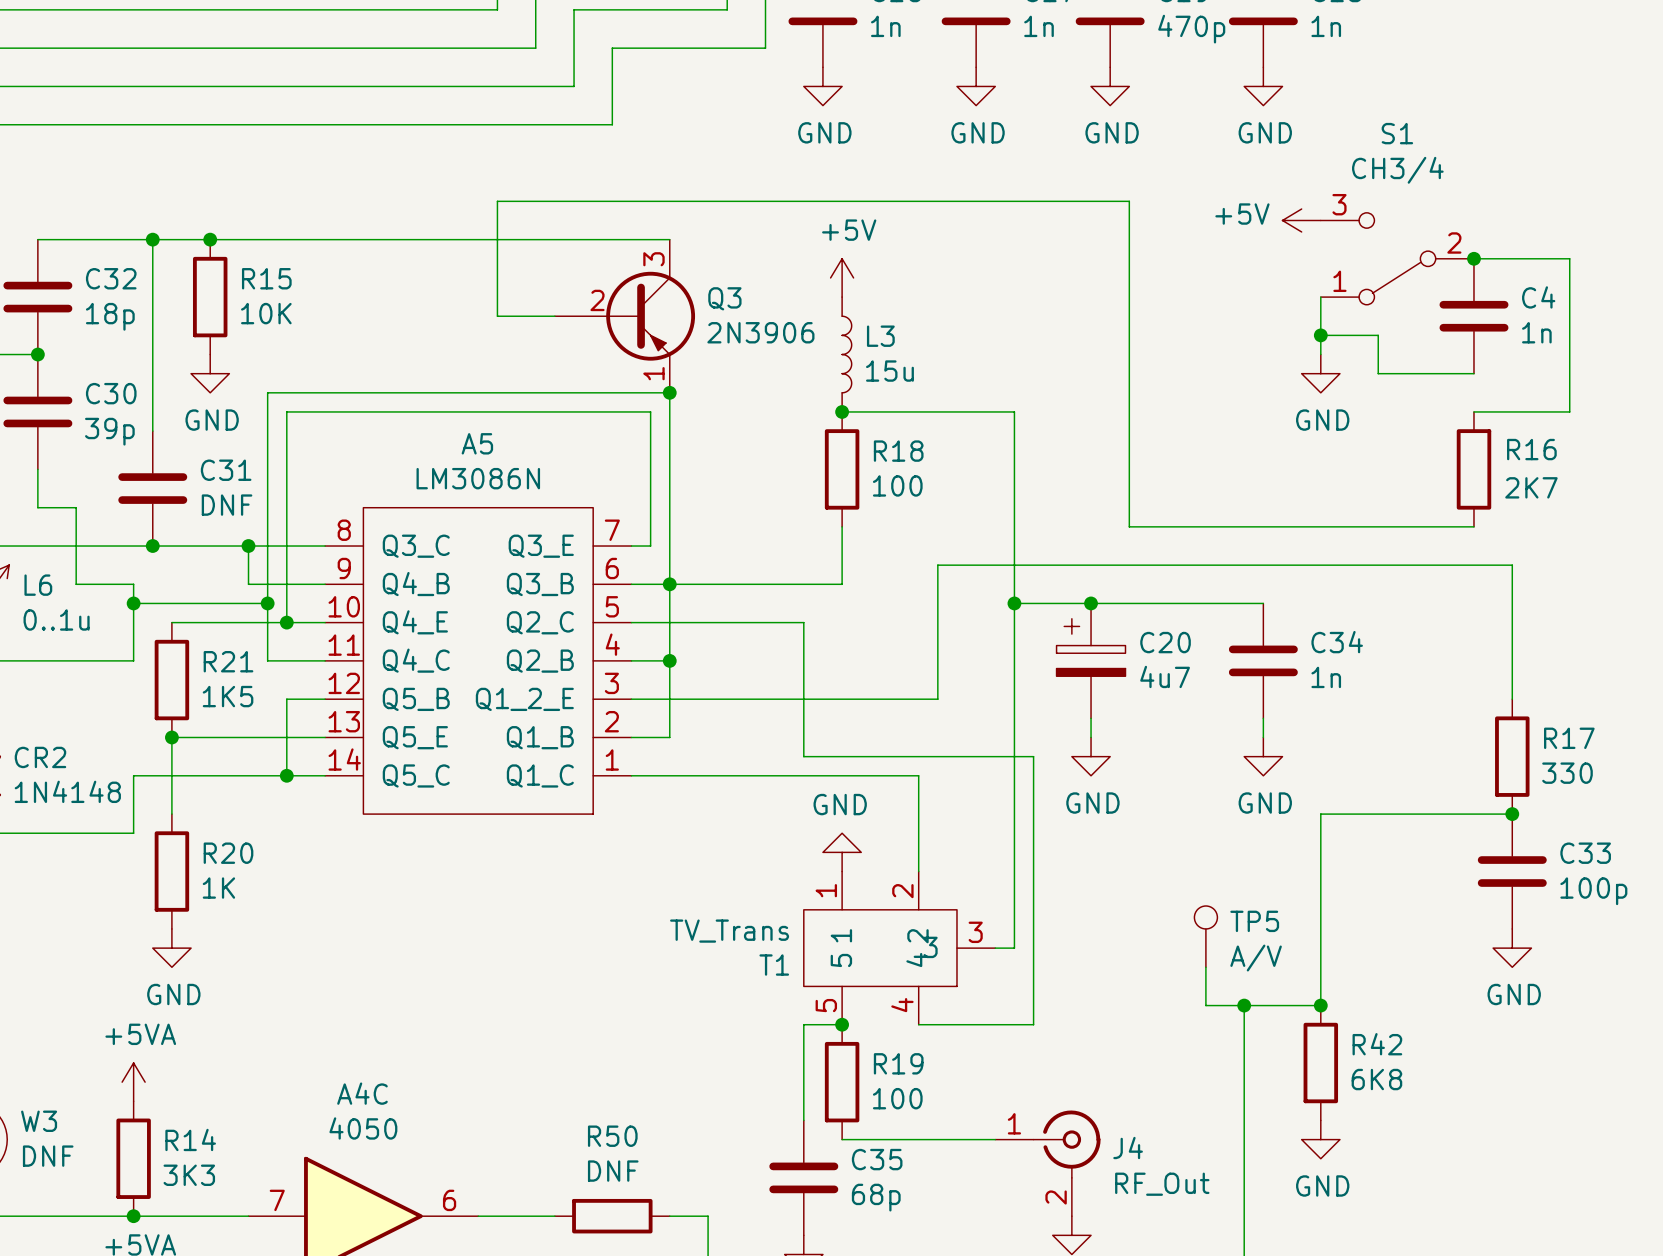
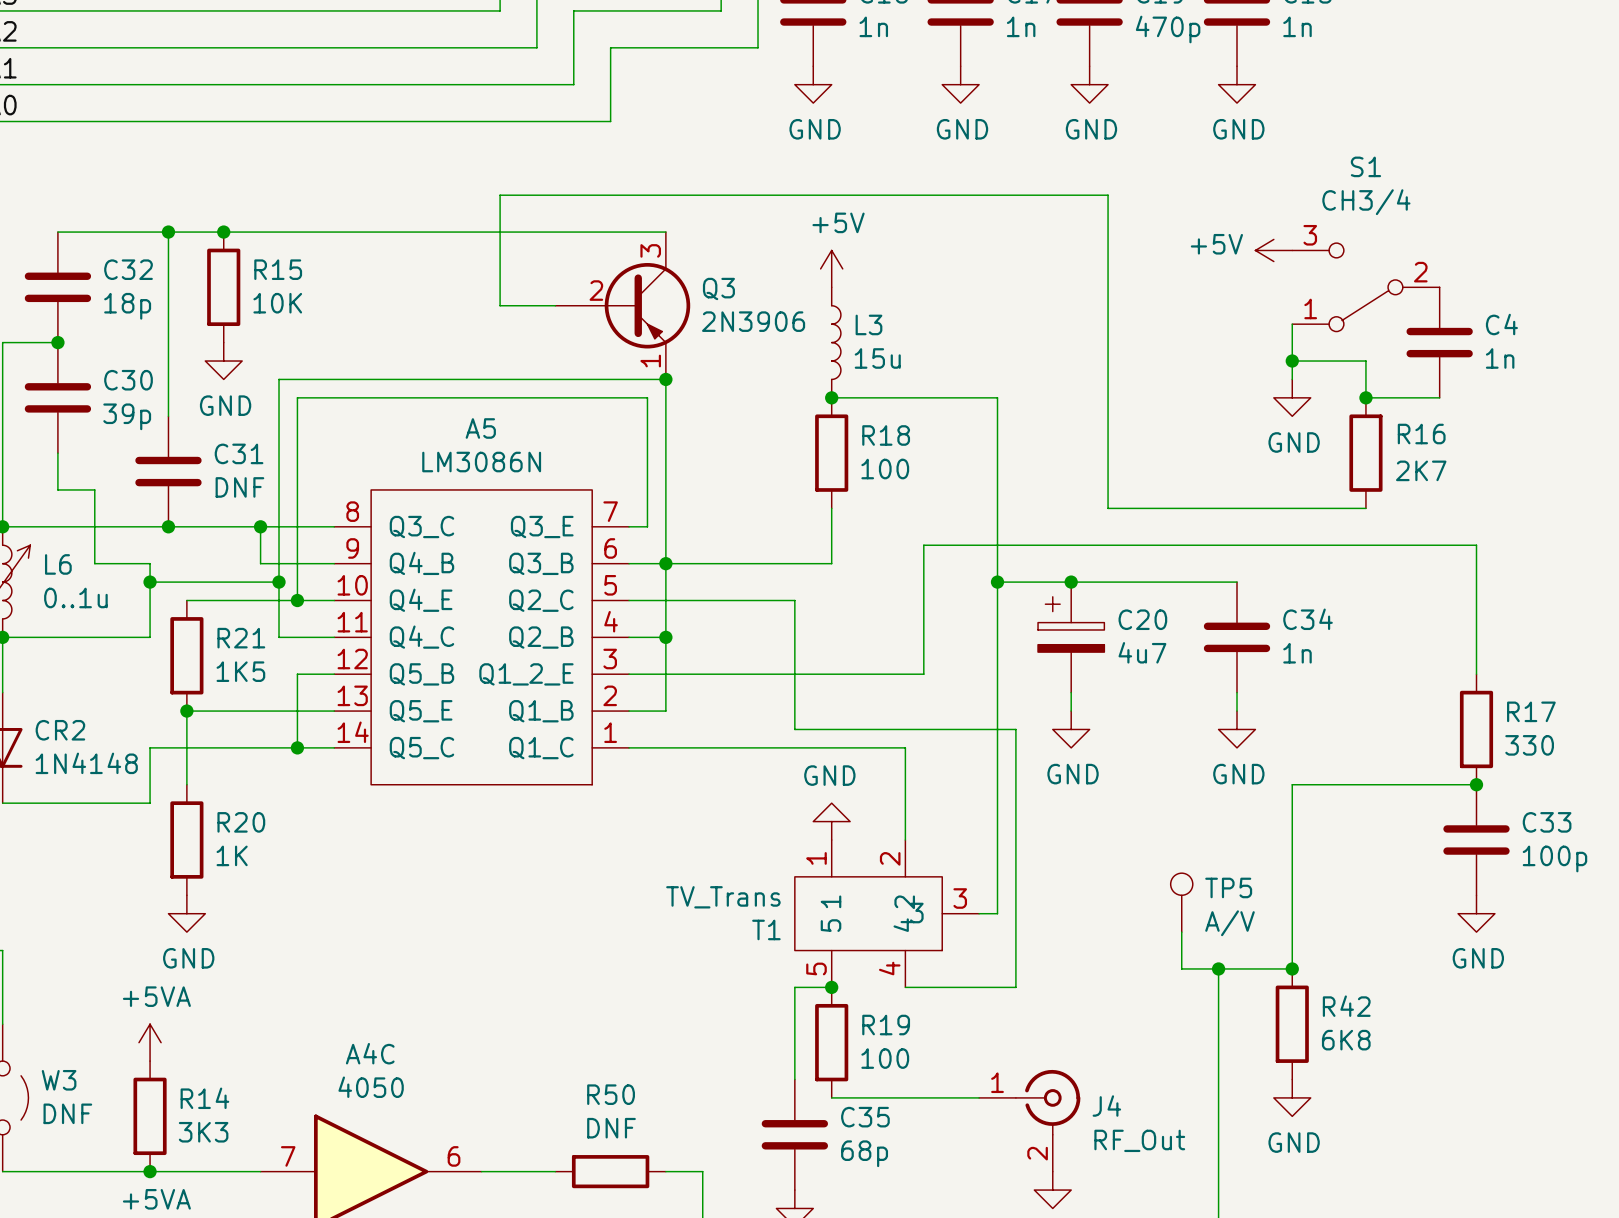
power symbol position: +5V (1301, 220) -> +5V (1273, 250)
S1 position: (1397, 258) -> (1365, 287)
wire: (1473, 258) (1569, 258) (1569, 411) (1473, 411) -> none
junction: (1473, 258) -> none
wire: (1320, 297) (1320, 335) (1378, 335) (1378, 373) -> (1292, 361) (1347, 361)
C4 position: (1473, 316) -> (1439, 342)
junction position: (1320, 335) -> (1292, 361)
power symbol position: GND (1320, 373) -> GND (1292, 397)
wire: (1397, 373) (1473, 373) -> (1365, 361) (1365, 397) (1439, 397)
junction: none -> (1365, 397)
R16 position: (1473, 469) -> (1365, 453)
wire: (1397, 526) (1473, 526) -> none

